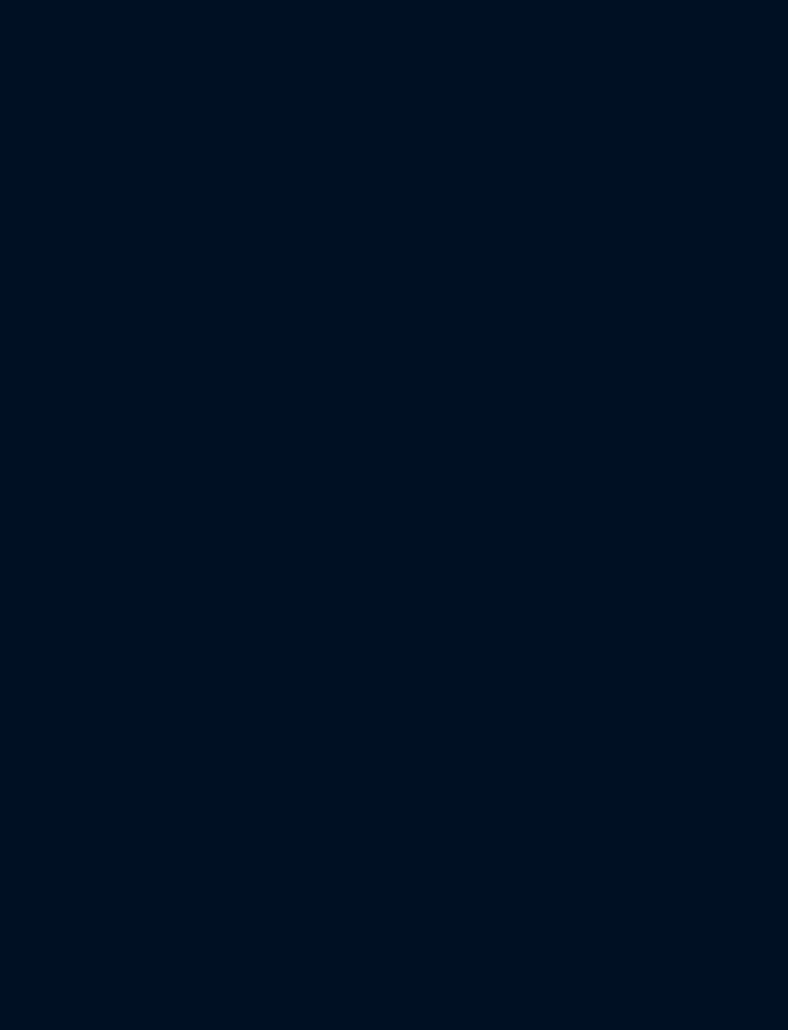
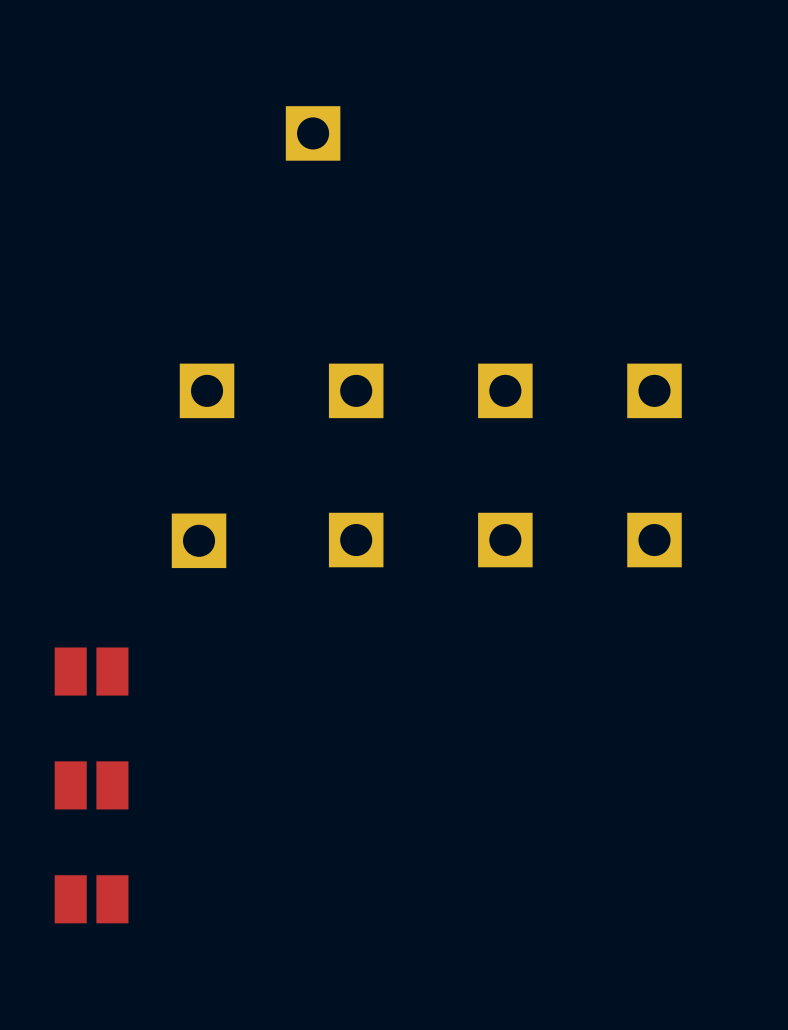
part: none -> (313, 133)
part: none -> (207, 390)
part: none -> (356, 390)
part: none -> (505, 390)
part: none -> (654, 390)
part: none -> (199, 540)
part: none -> (356, 540)
part: none -> (505, 540)
part: none -> (654, 540)
part: none -> (91, 671)
part: none -> (91, 785)
part: none -> (91, 899)

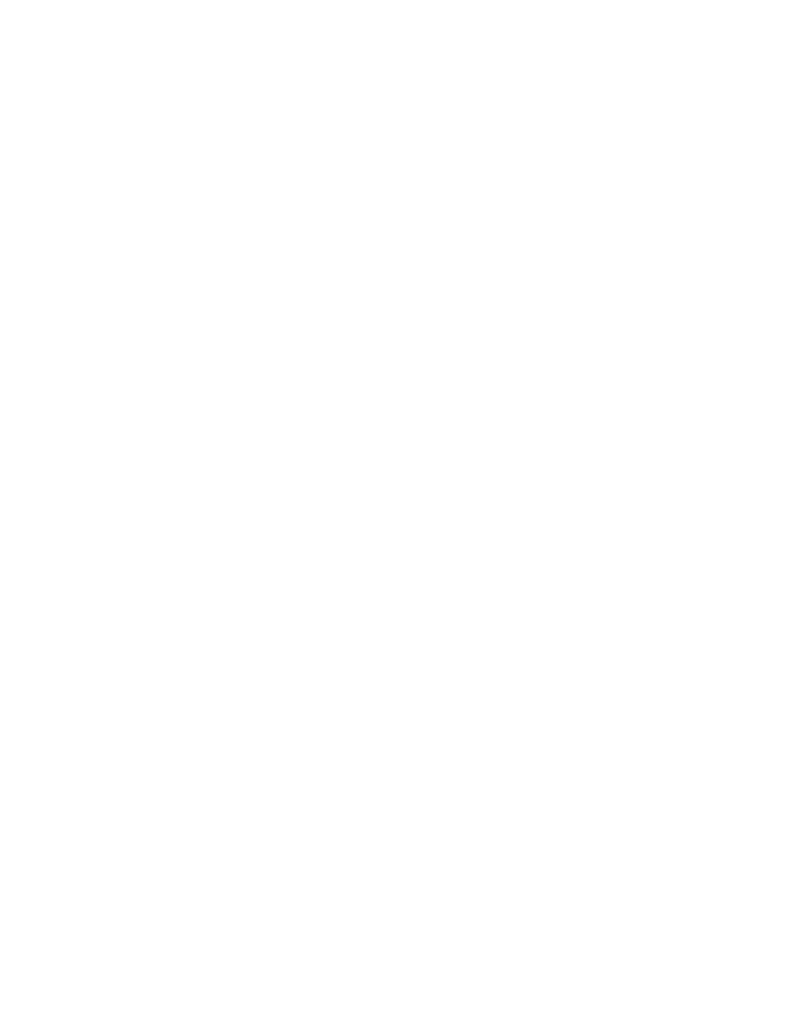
part: (313, 133) -> none
part: (207, 390) -> none
part: (356, 390) -> none
part: (505, 390) -> none
part: (654, 390) -> none
part: (199, 540) -> none
part: (356, 540) -> none
part: (505, 540) -> none
part: (654, 540) -> none
part: (91, 671) -> none
part: (91, 785) -> none
part: (91, 899) -> none

